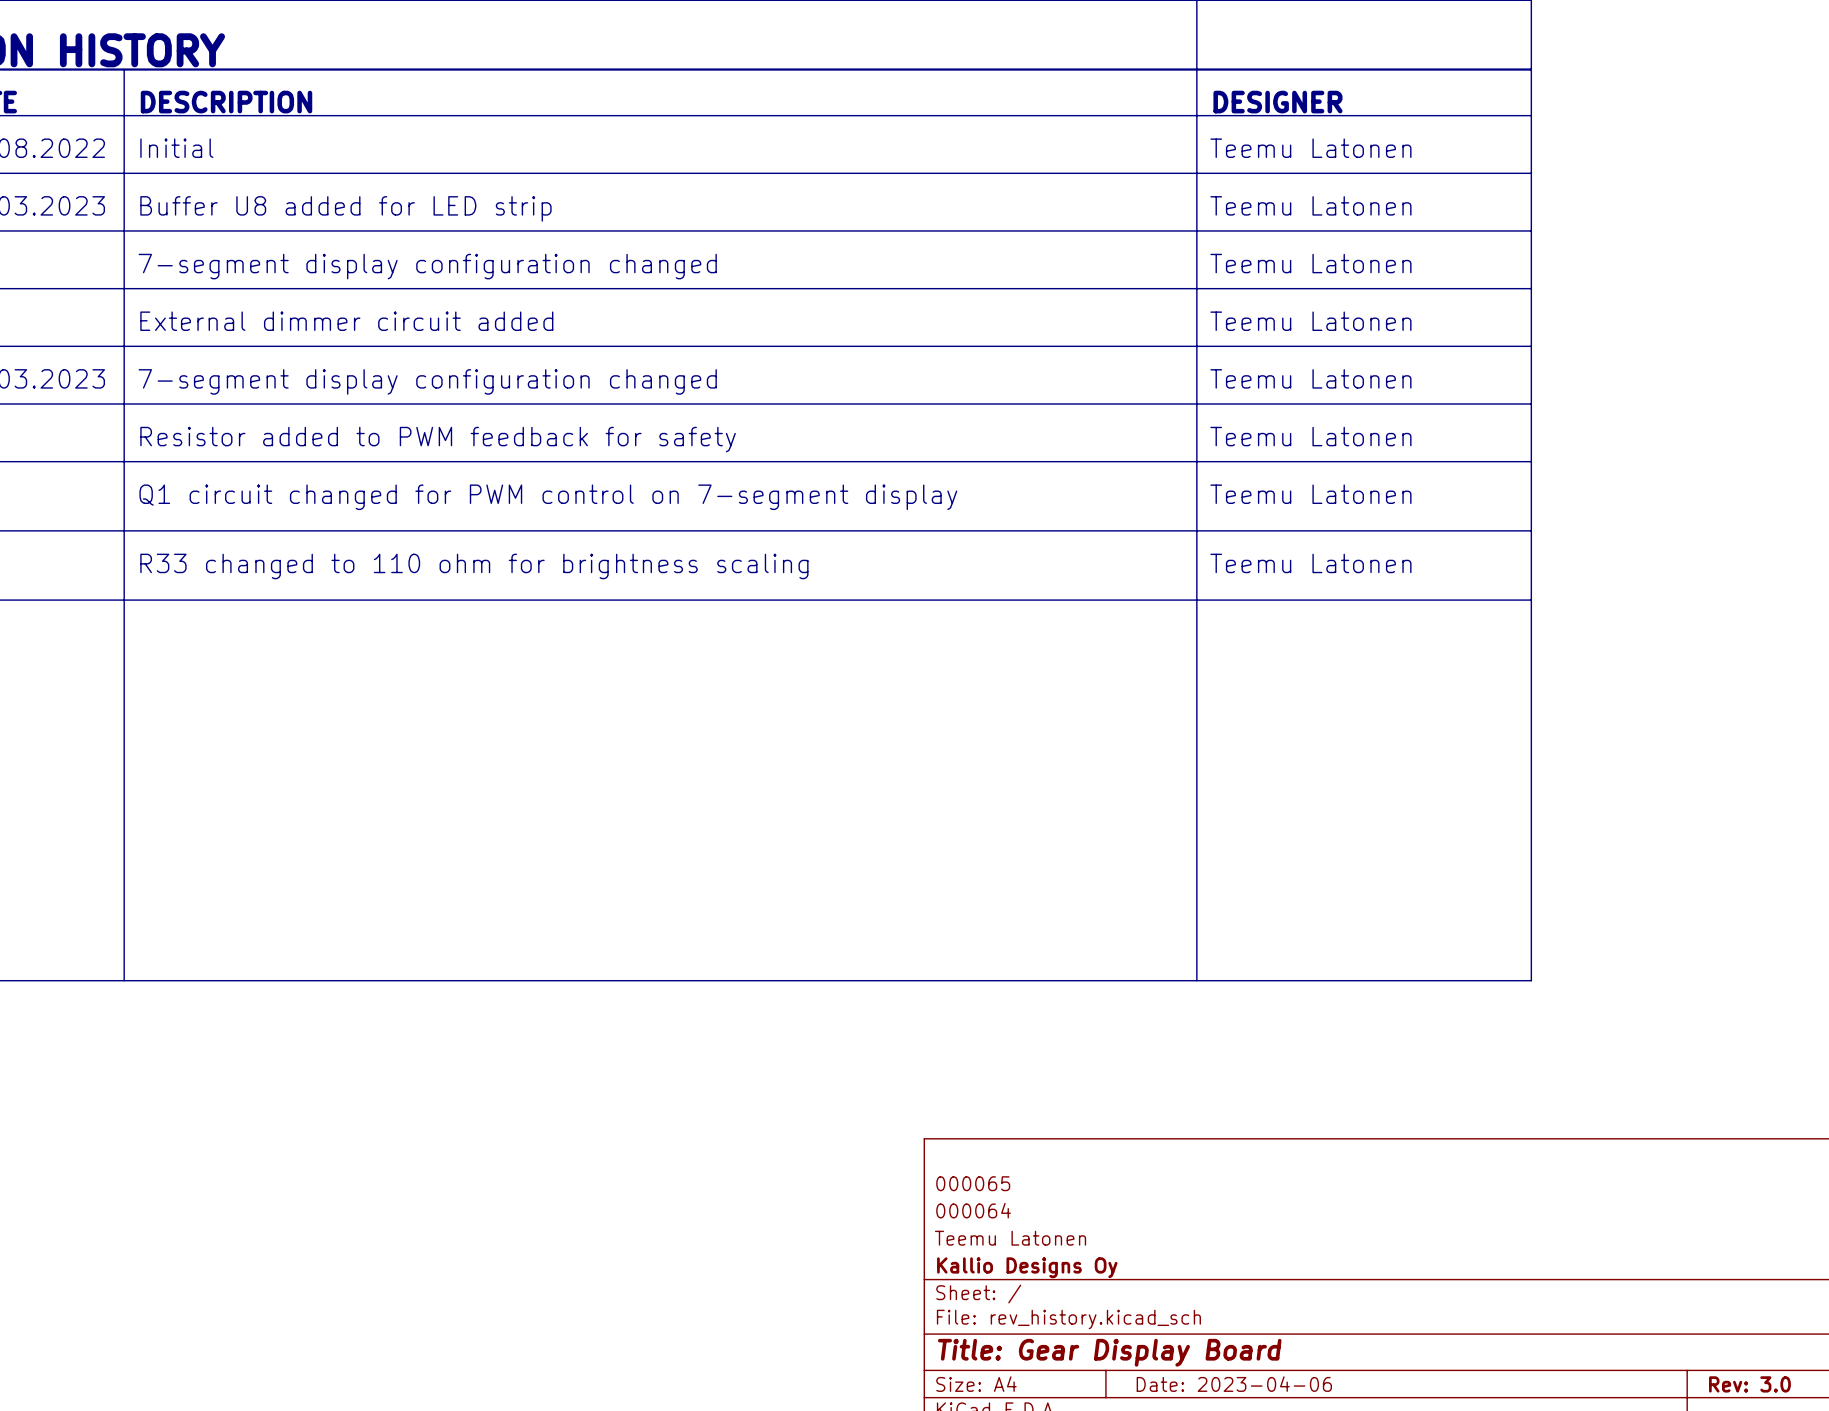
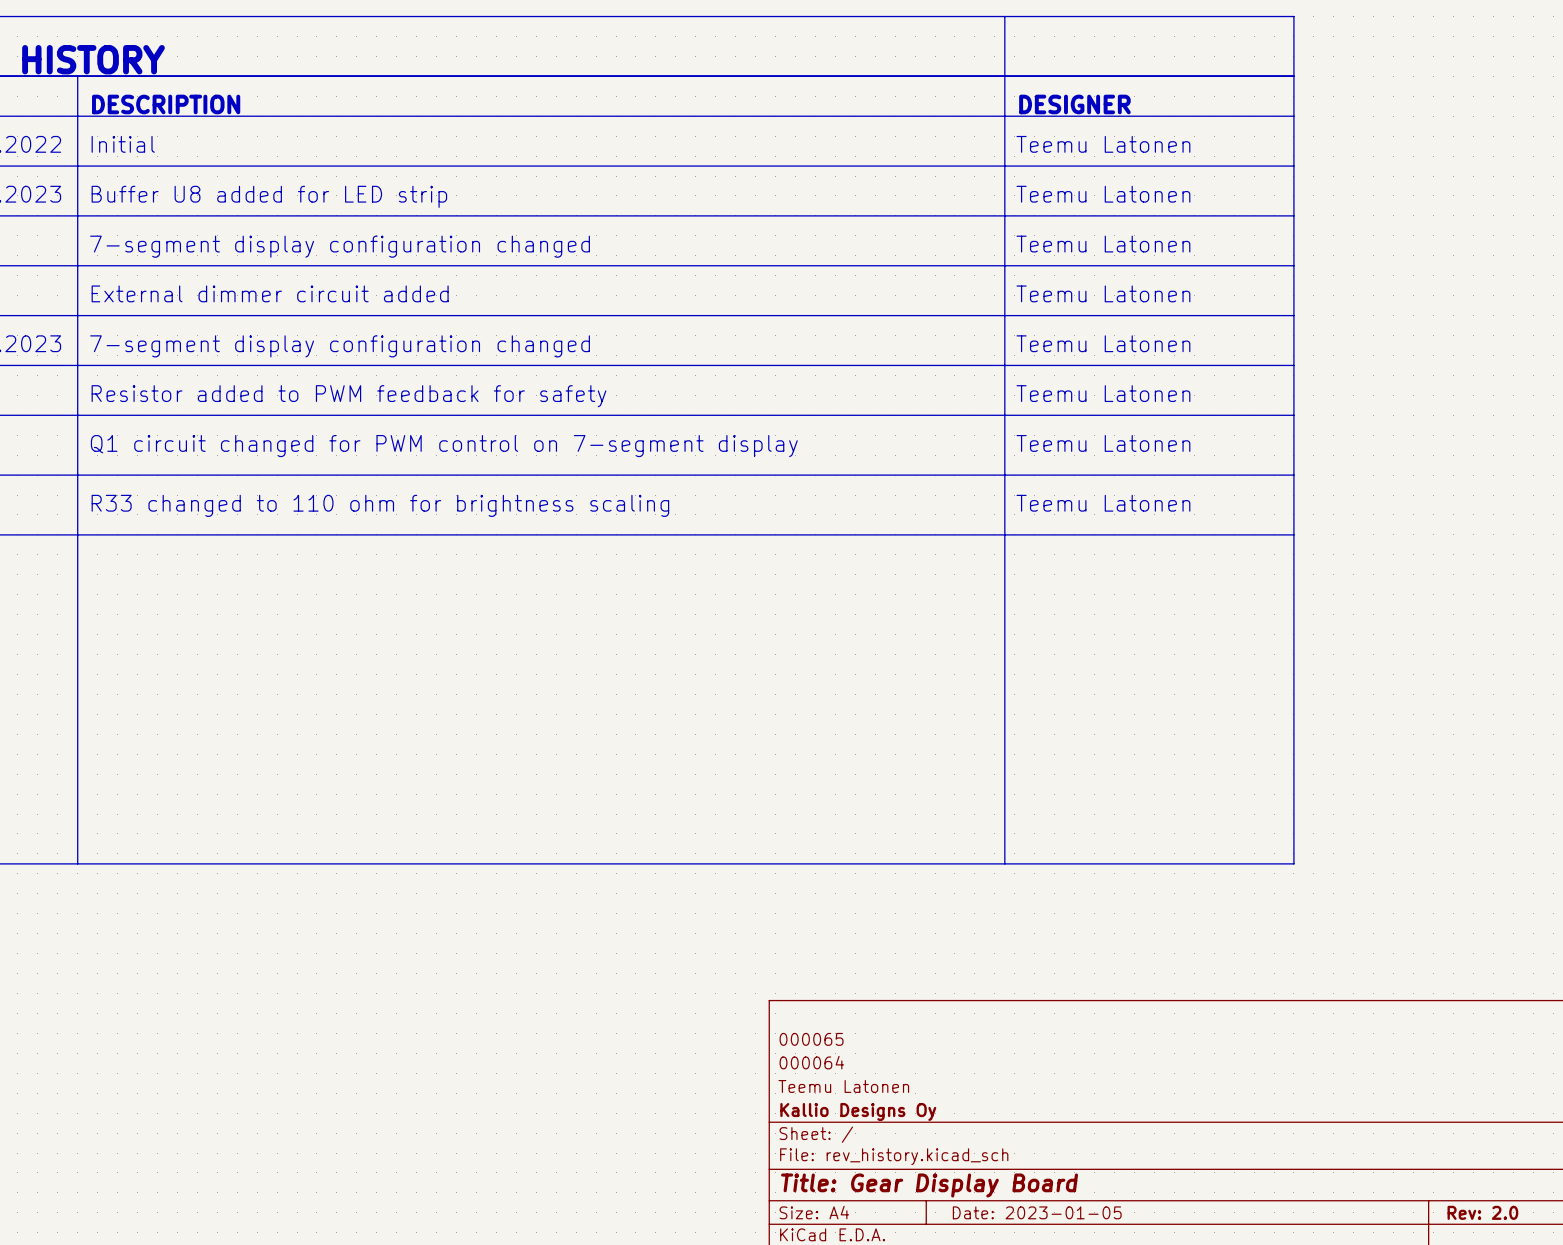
title block: Date: 2023-04-06 (1234, 1384) -> Date: 2023-01-05 (1037, 1212)
title block: Rev: 3.0 (1749, 1384) -> Rev: 2.0 (1482, 1212)

